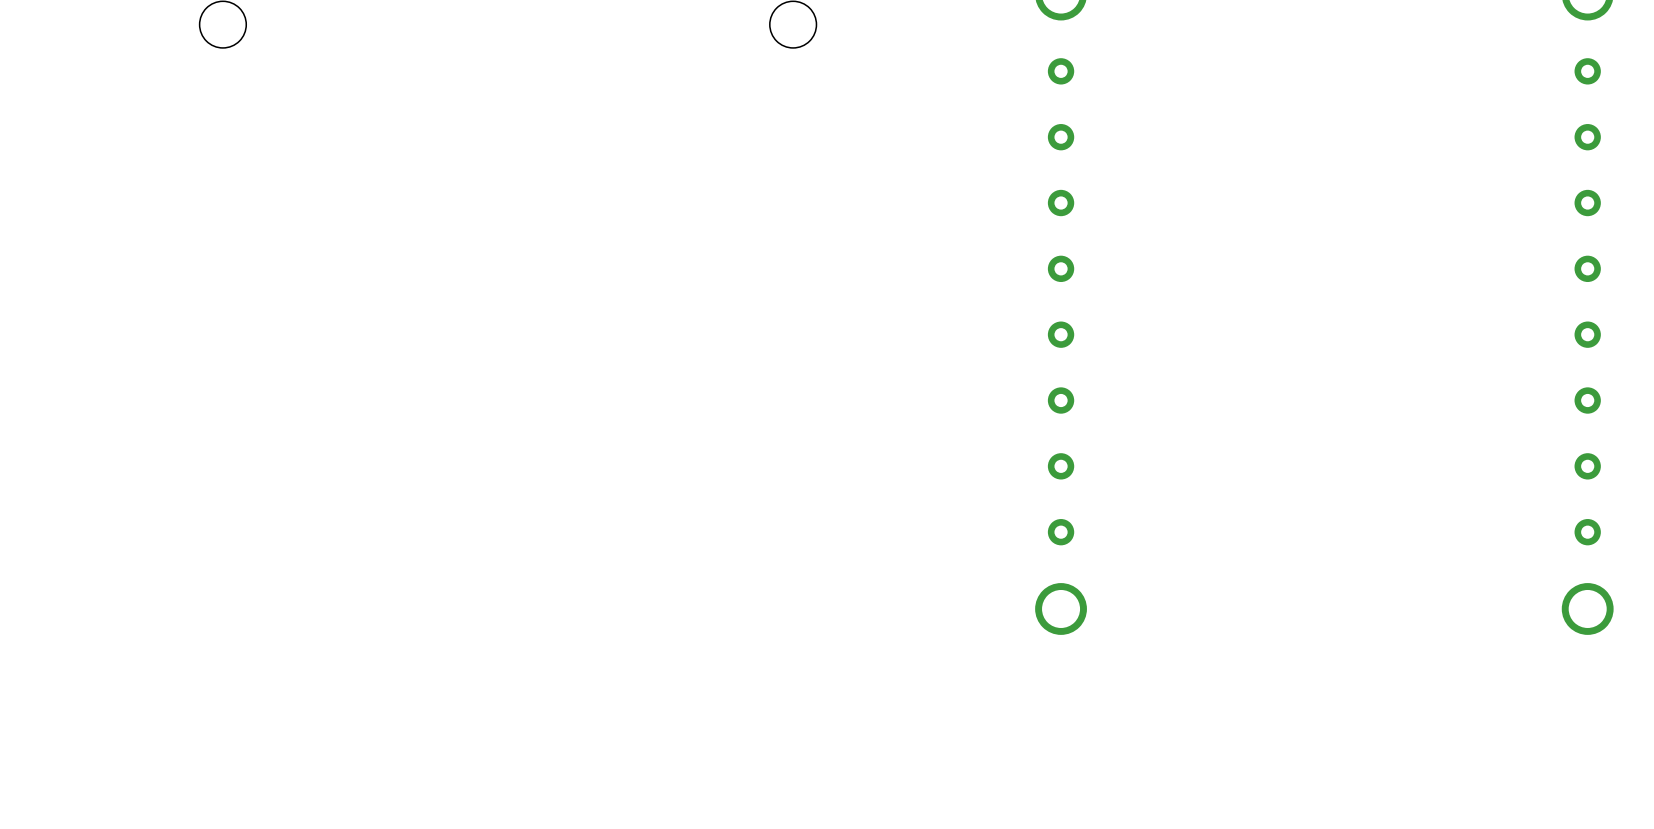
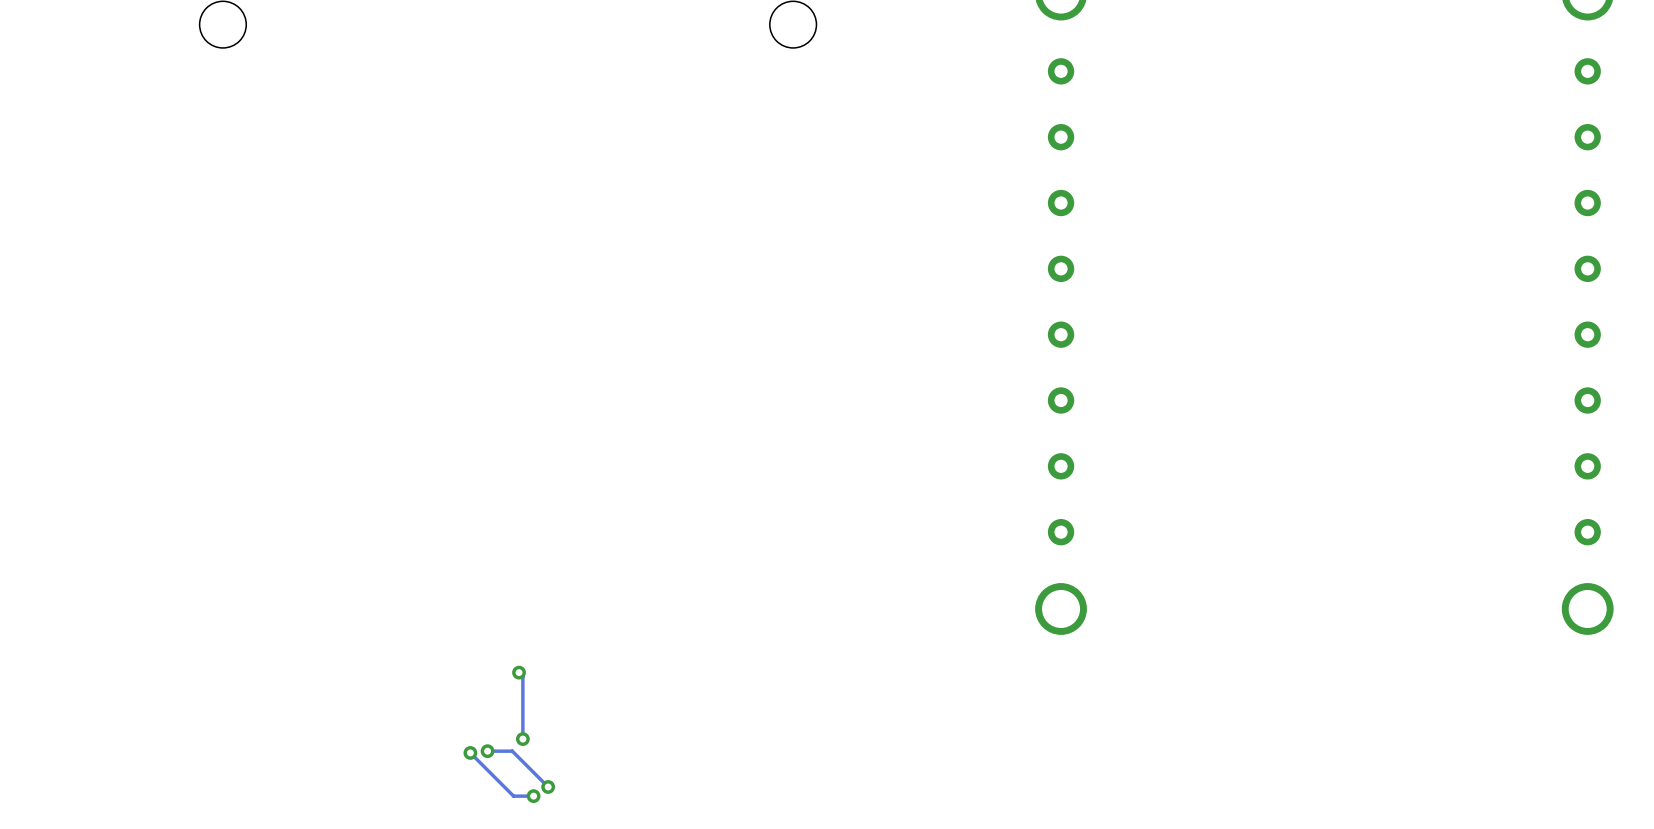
track: none -> (519, 672) (522, 676) (522, 739)
via: none -> (519, 672)
via: none -> (522, 739)
track: none -> (487, 751) (512, 751) (548, 786)
via: none -> (487, 751)
track: none -> (470, 752) (513, 796) (533, 796)
via: none -> (470, 752)
via: none -> (548, 786)
via: none -> (533, 796)

